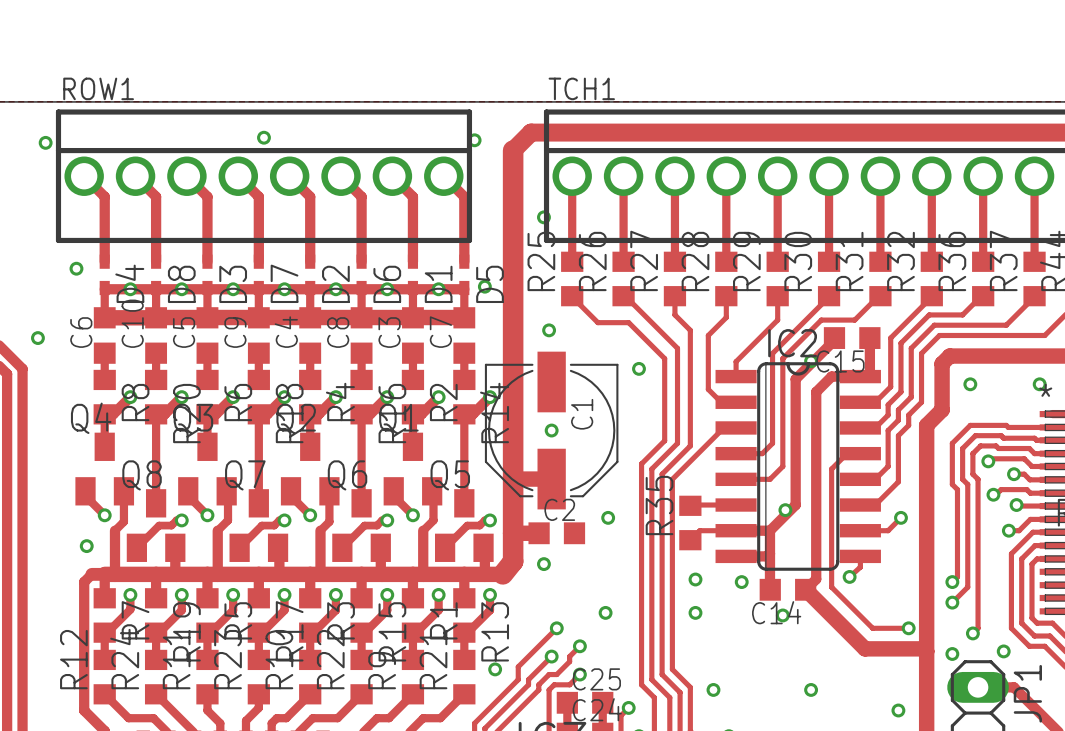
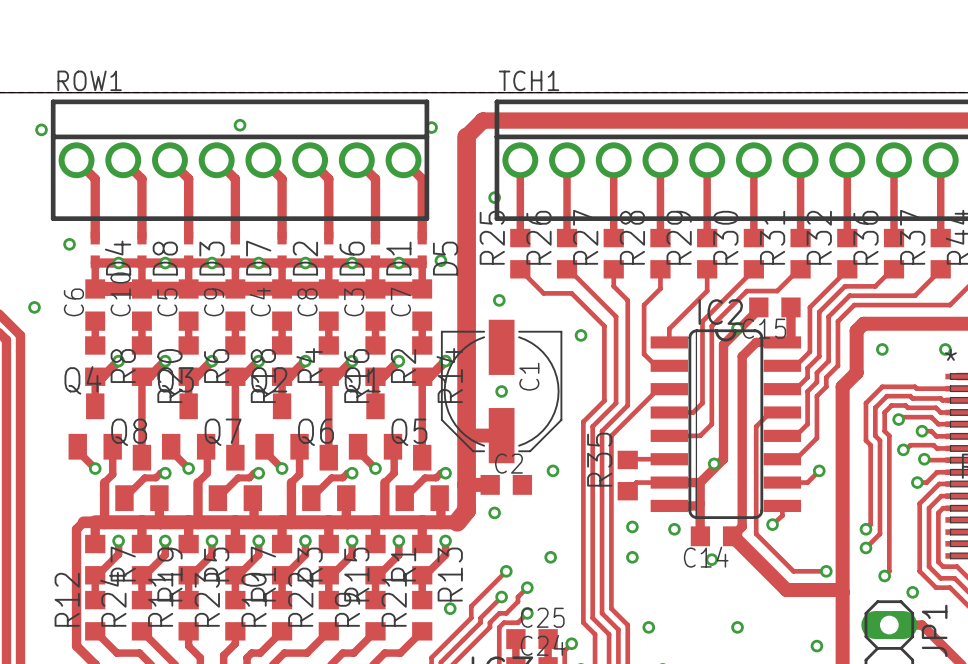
via: (86, 546) -> none
via: (952, 653) -> none

